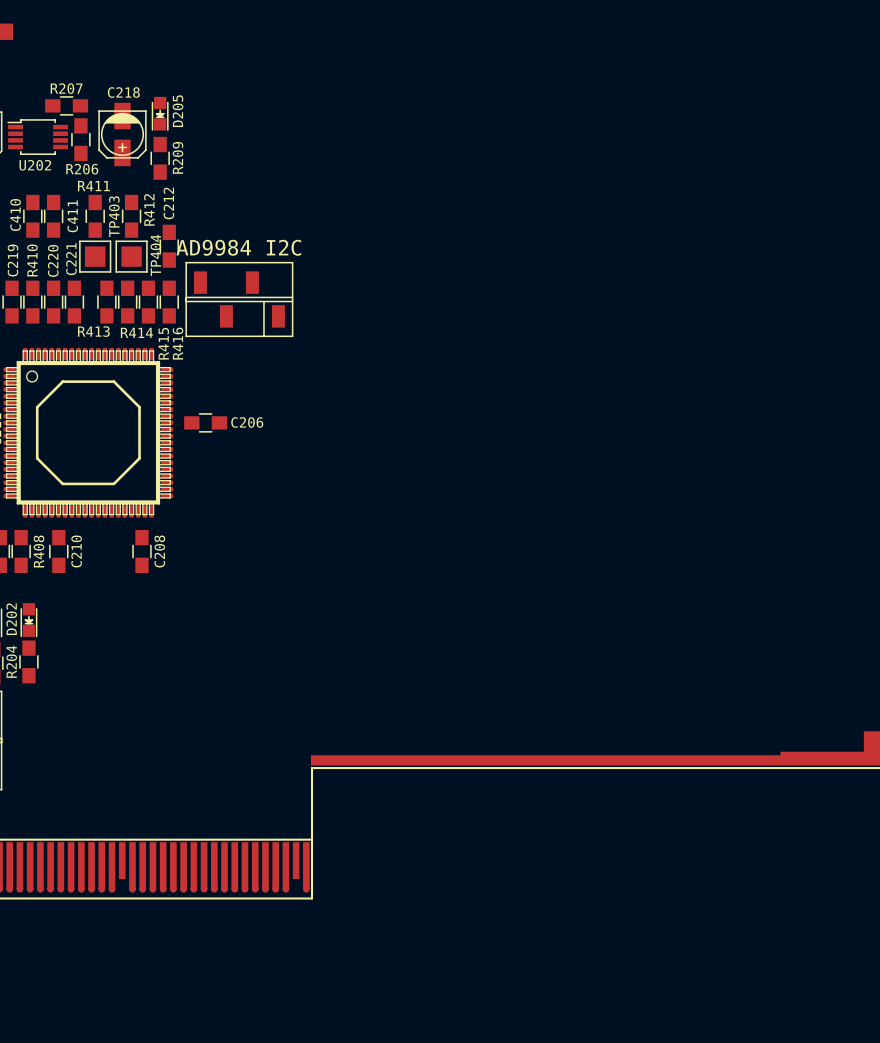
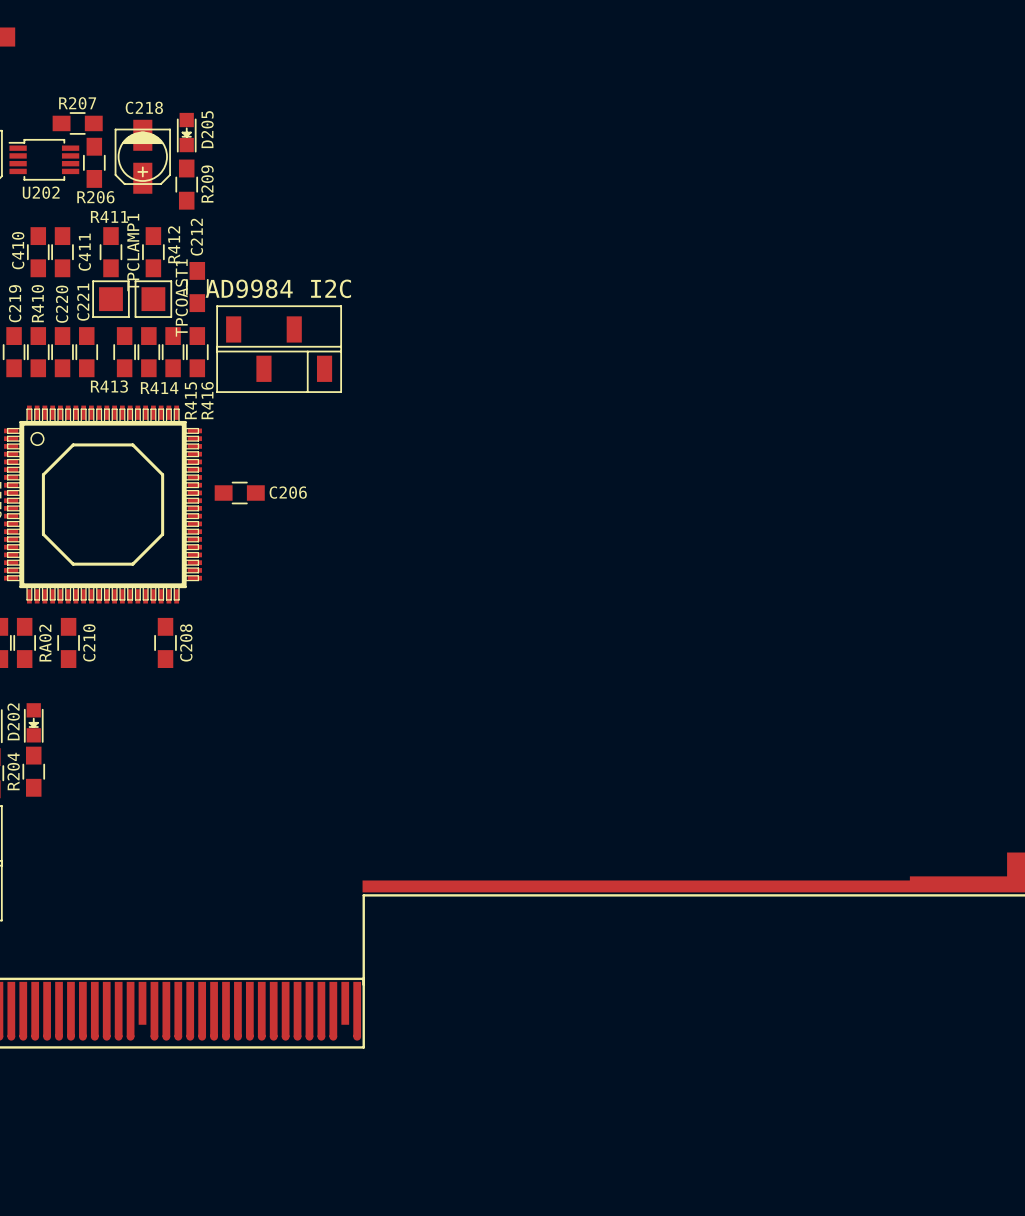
TP403 name: TP403 (114, 216) -> TPCLAMP1 (133, 252)
TP404 name: TP404 (155, 255) -> TPCOAST1 (181, 297)
R408 name: R408 (38, 551) -> RA02 (45, 643)

